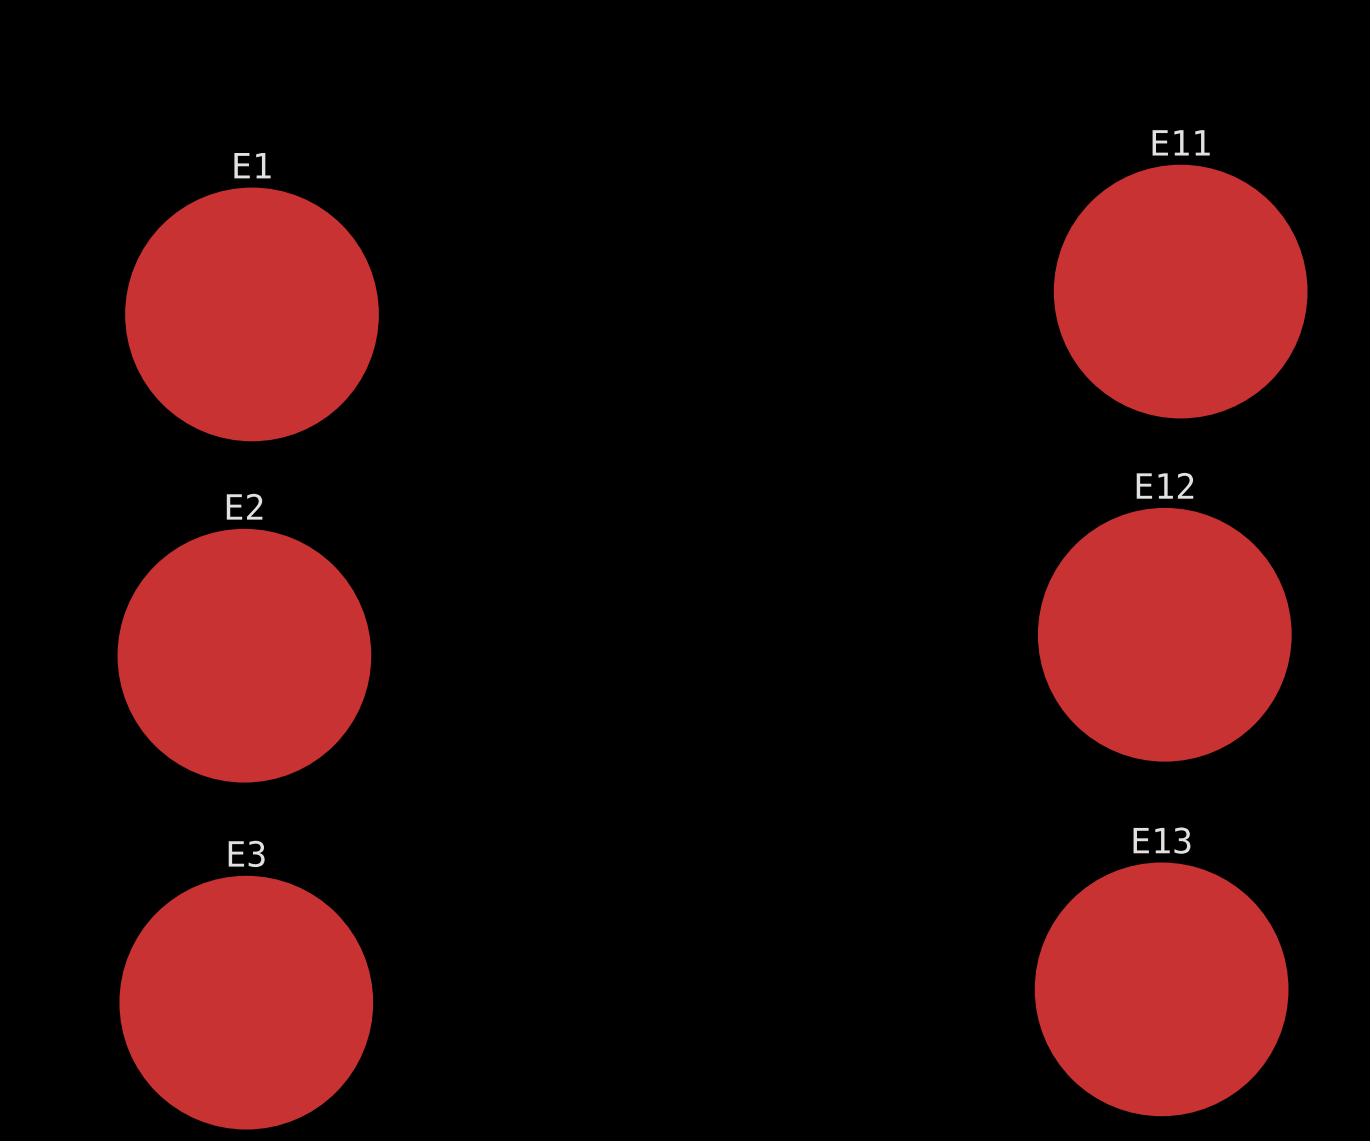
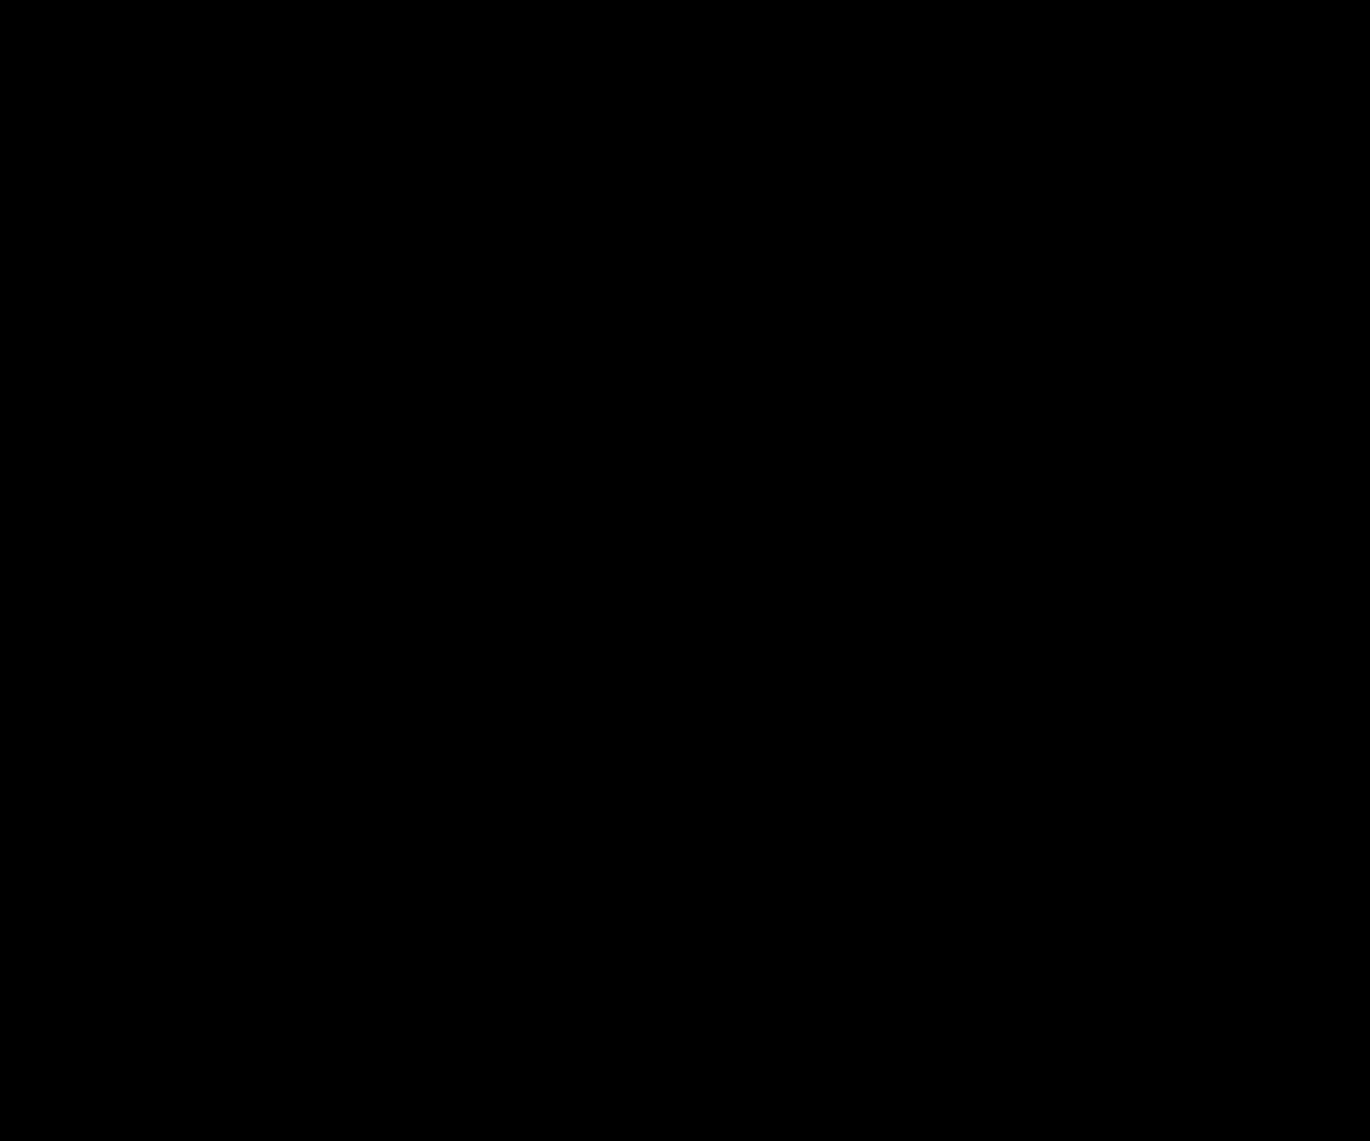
E11: (1180, 291) -> none
E1: (252, 314) -> none
E12: (1164, 634) -> none
E2: (244, 655) -> none
E13: (1161, 989) -> none
E3: (246, 1002) -> none

